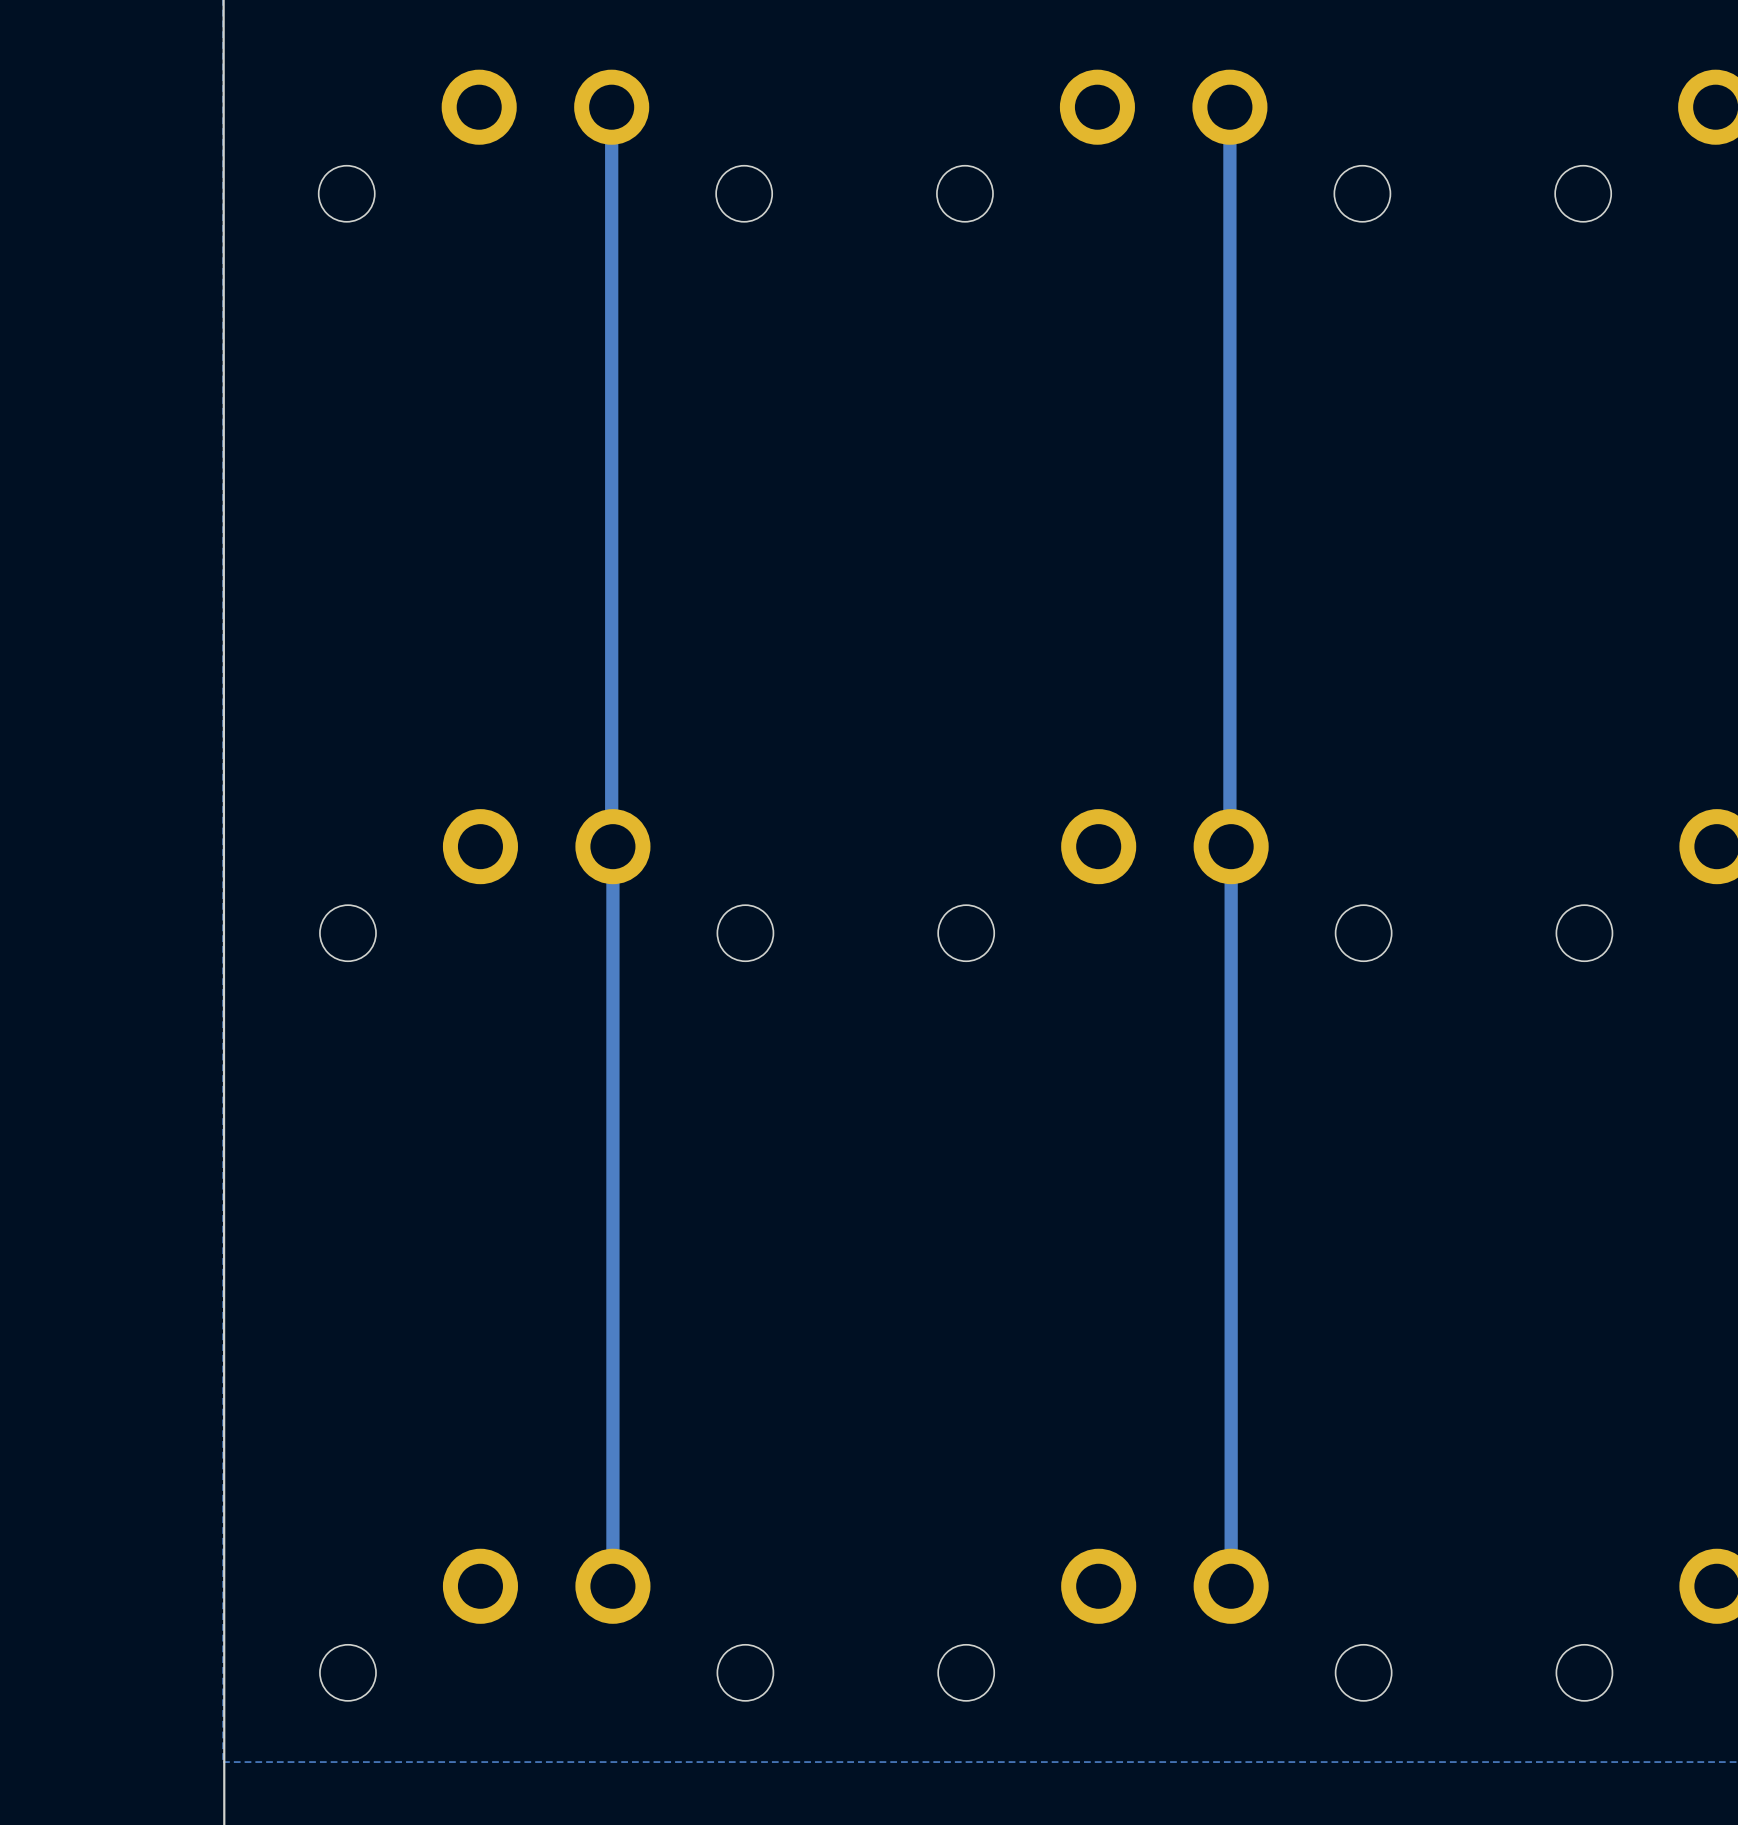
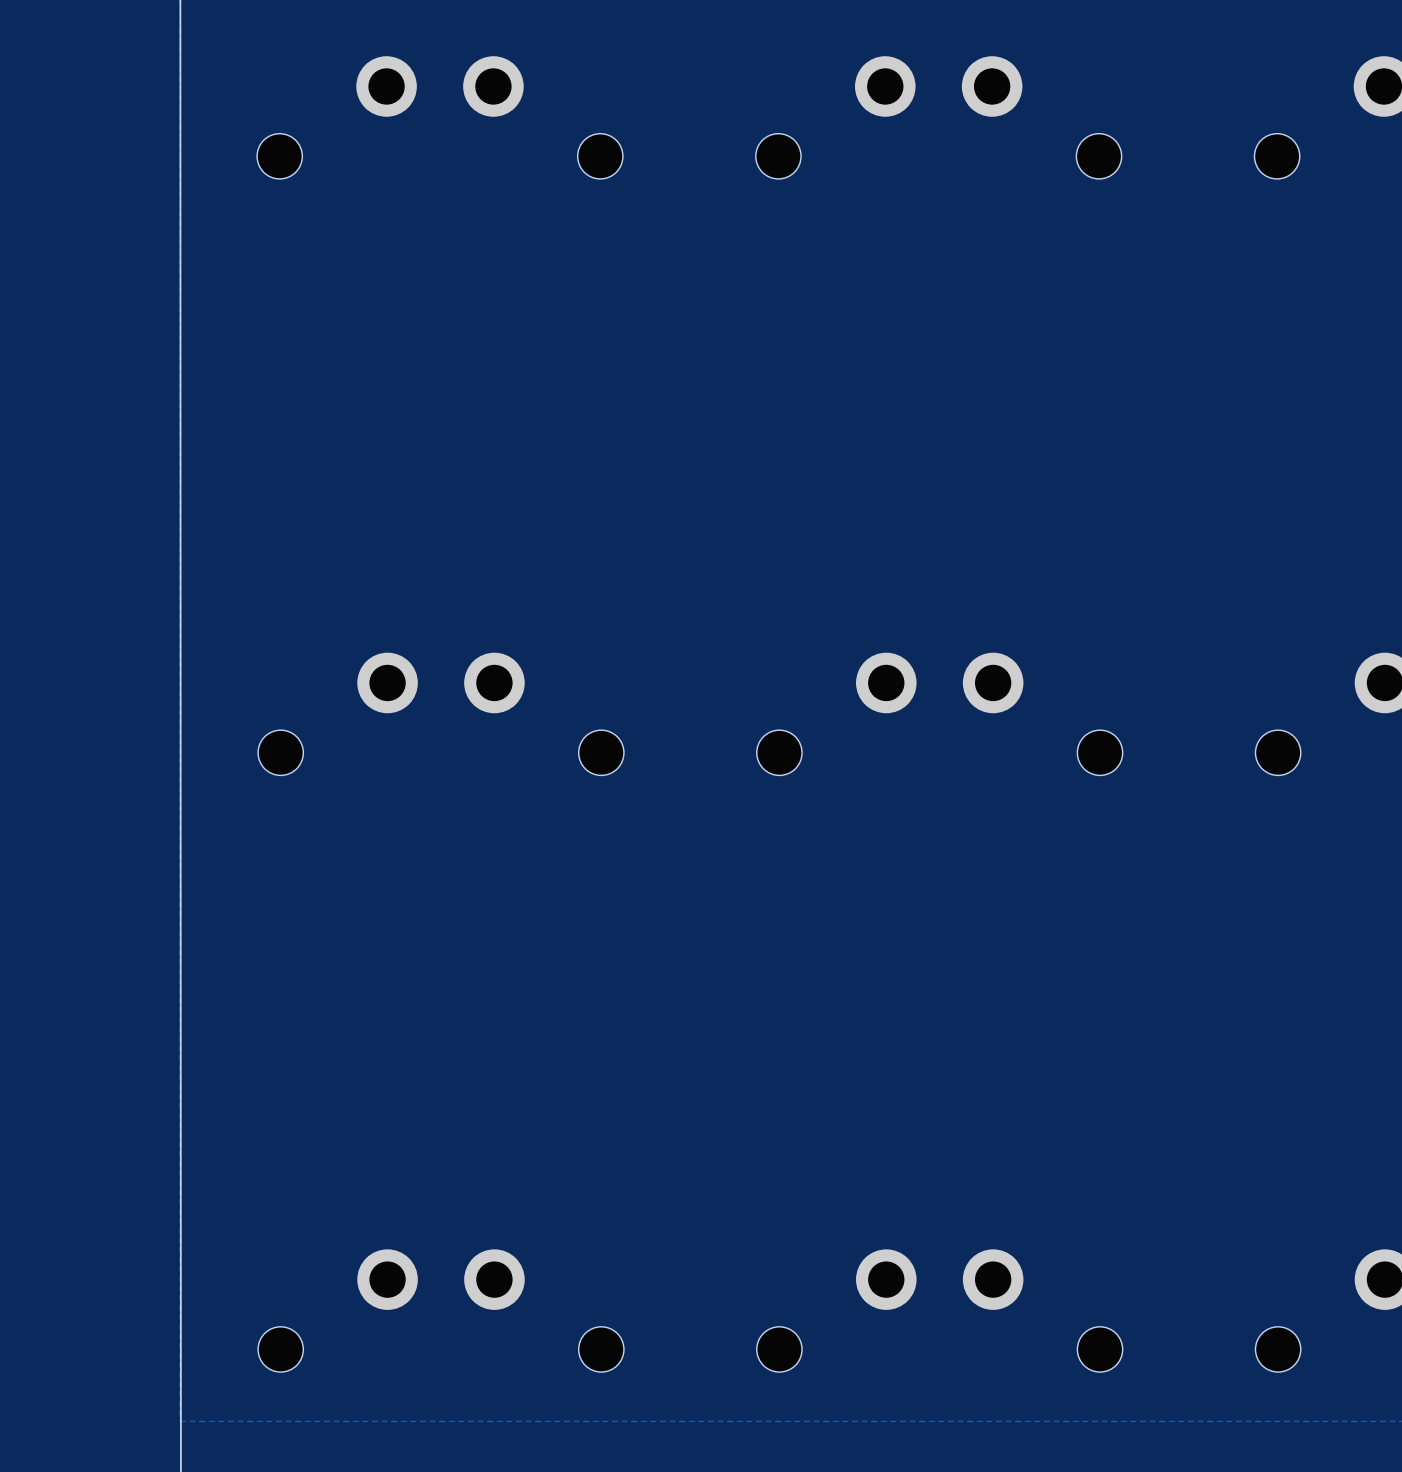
track: (611, 107) (612, 1586) -> none
track: (1229, 107) (1231, 1586) -> none

